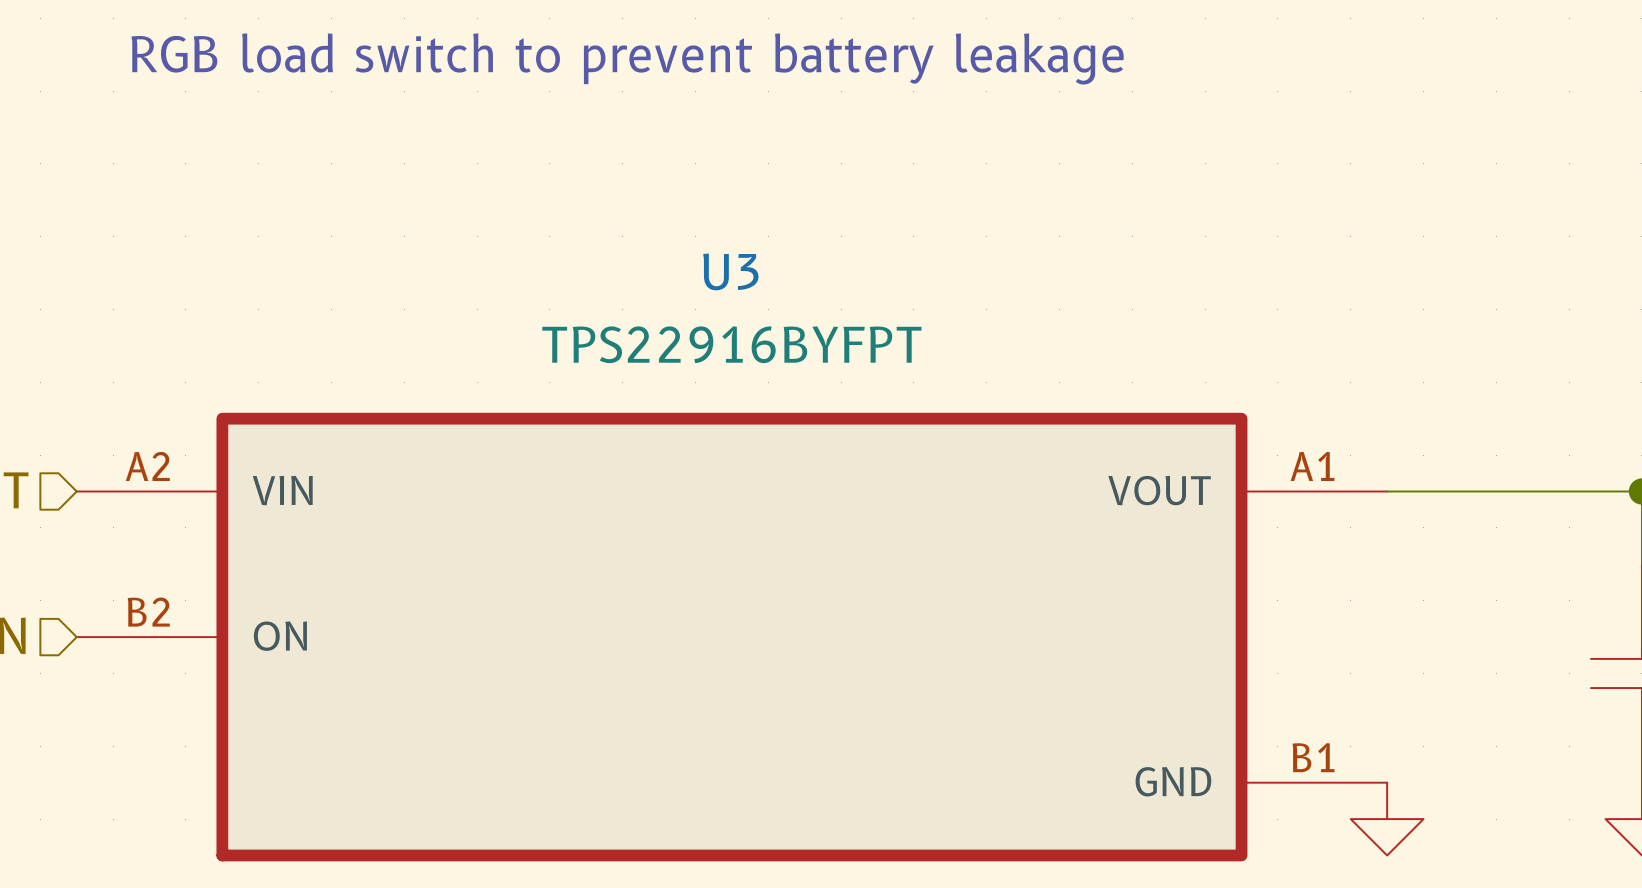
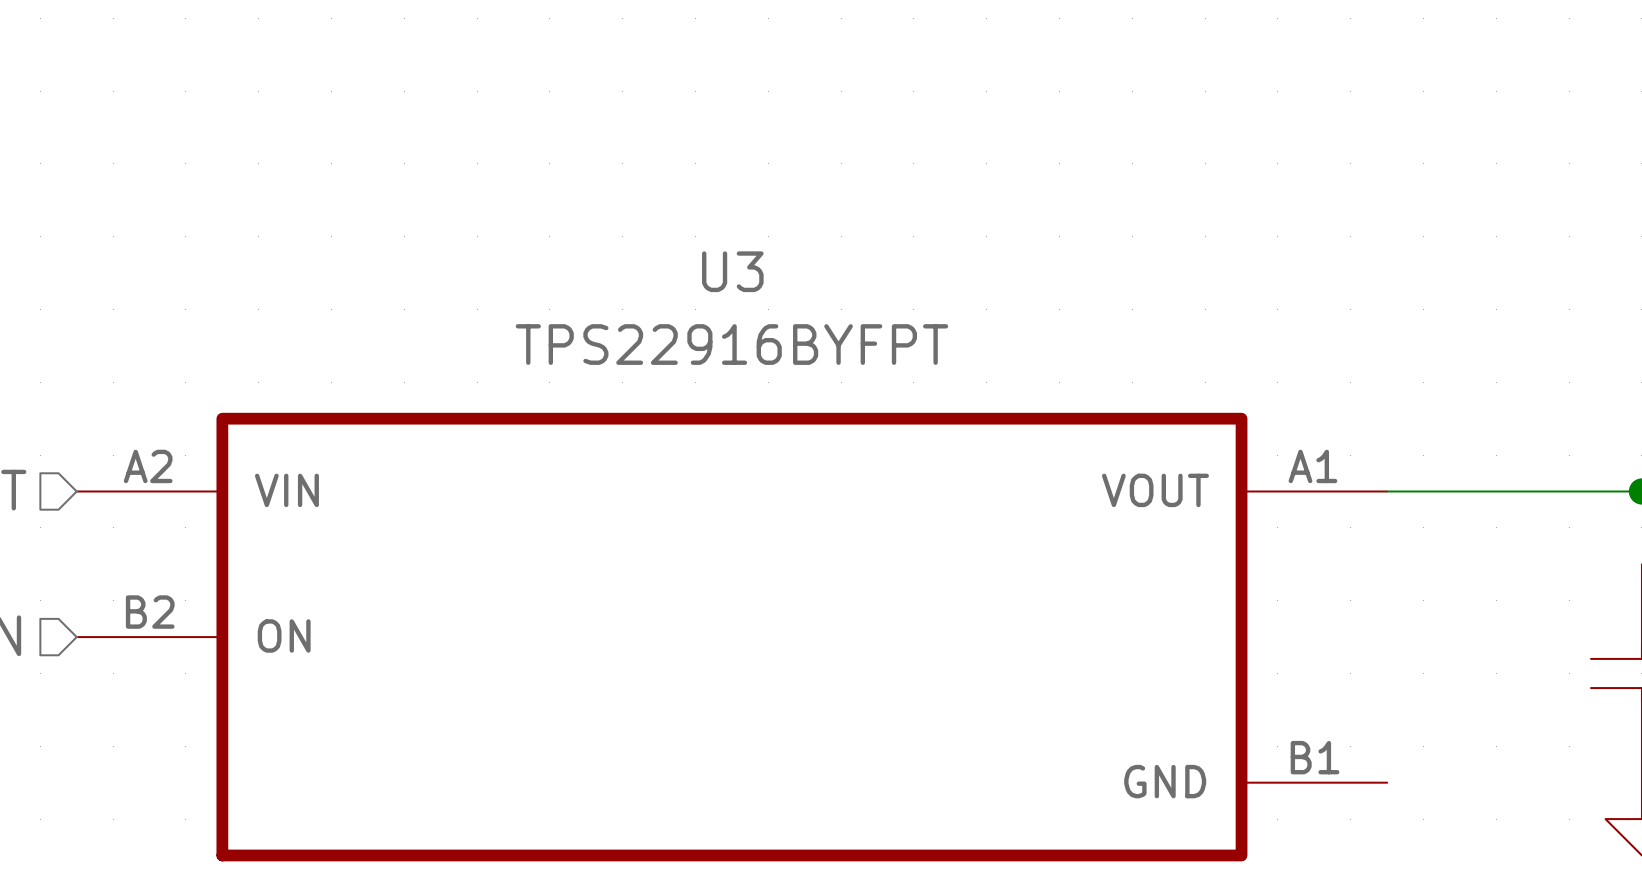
text: RGB load switch to prevent battery leakage (627, 58) -> none
wire: (1641, 491) (1641, 564) -> none
power symbol: (1387, 819) -> none

